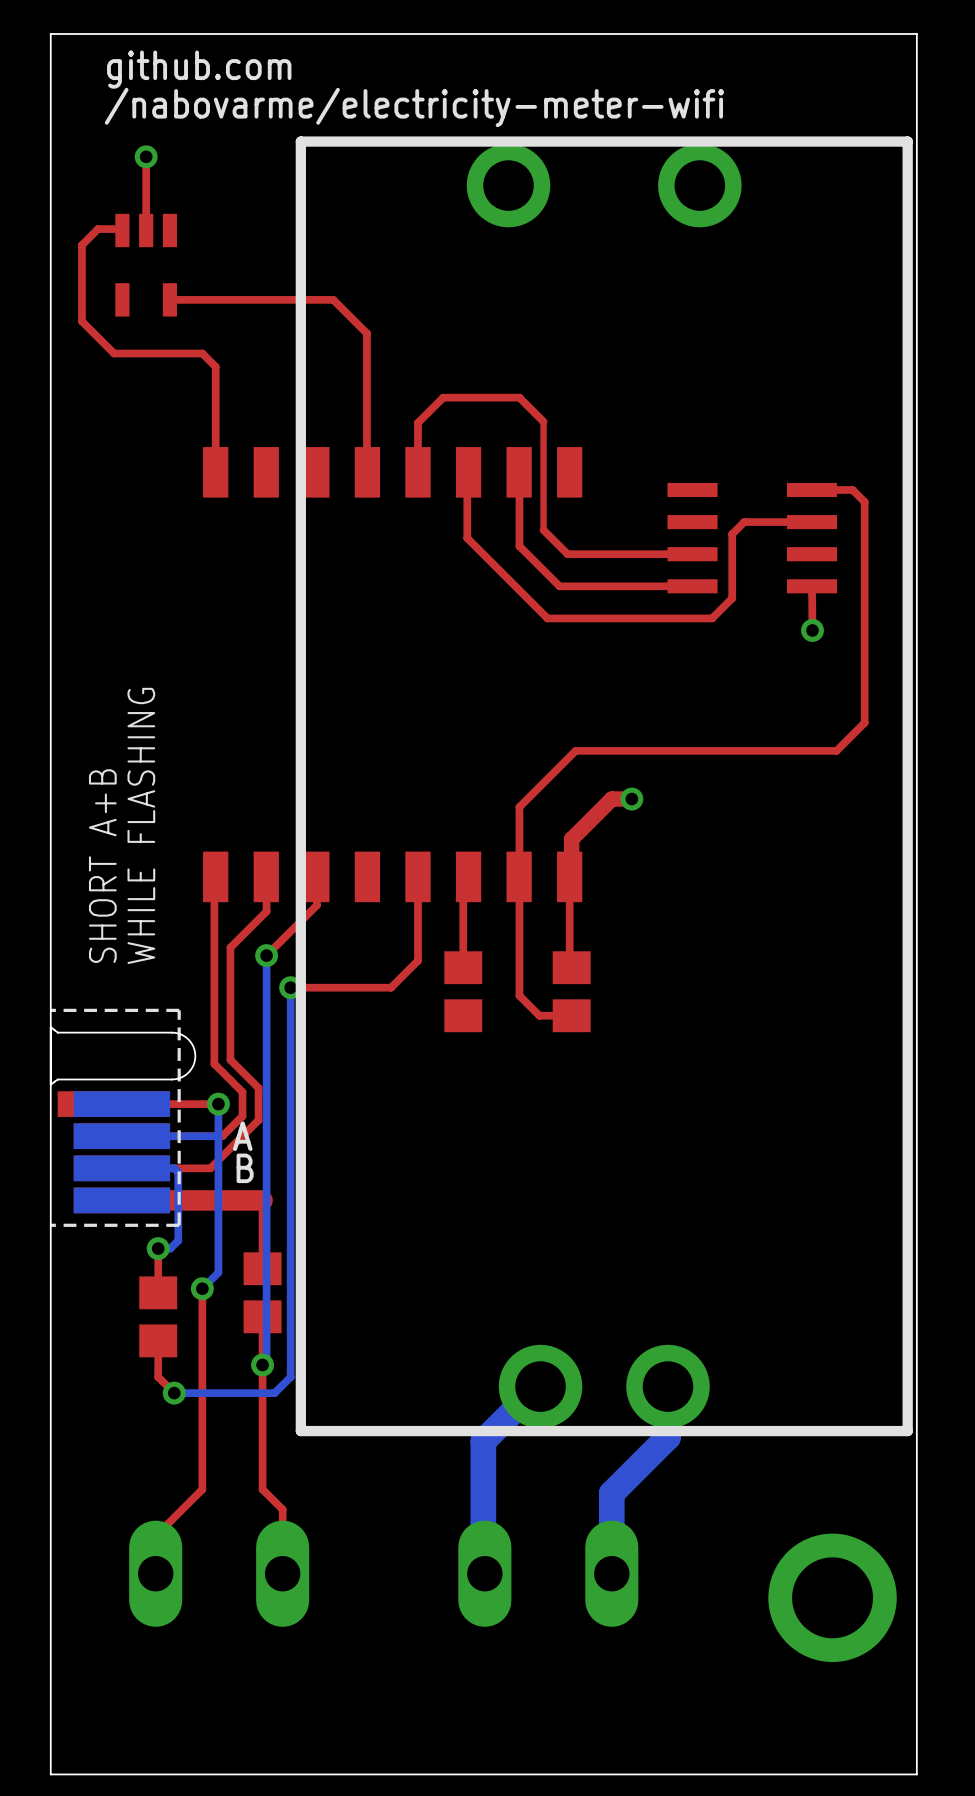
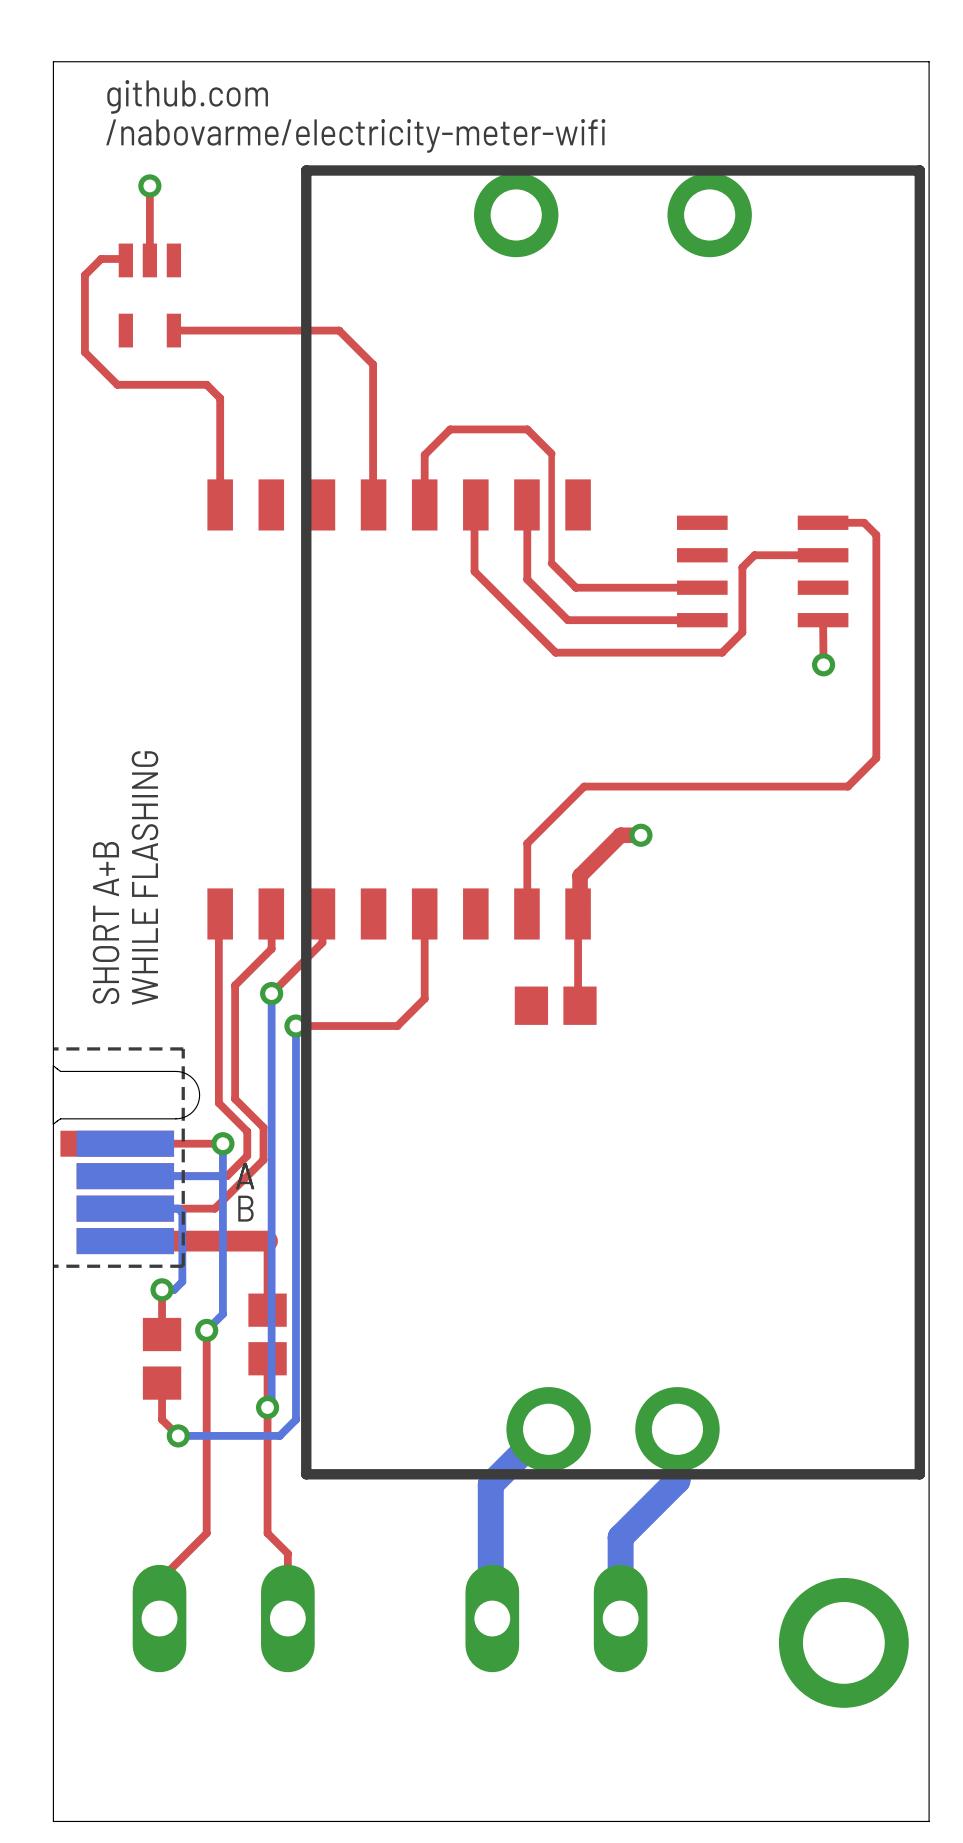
top track: (468, 876) (463, 882) (463, 967) -> none
top track: (519, 877) (519, 995) (539, 1015) (571, 1015) -> none
part: (463, 991) -> none
part rotation: 0° (571, 991) -> 90° clockwise (555, 1005)

